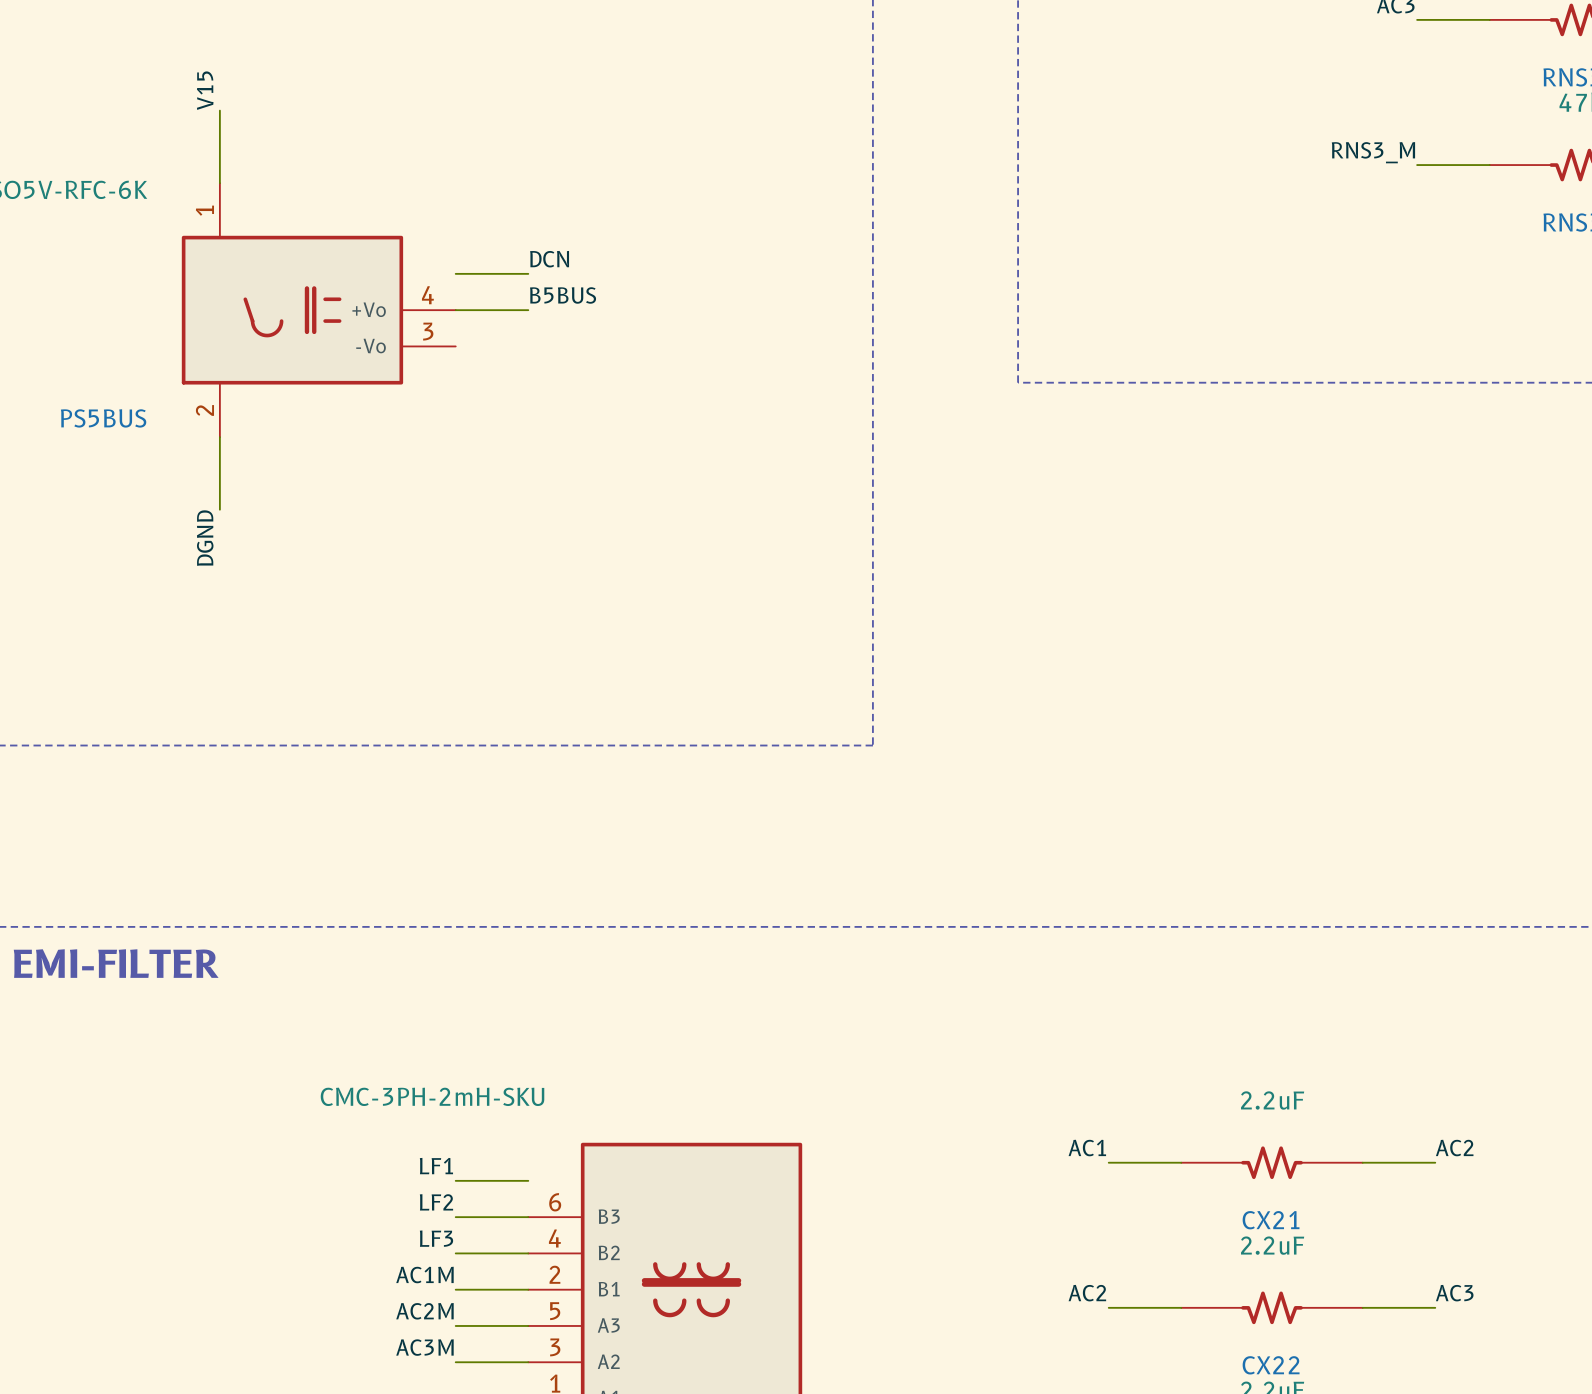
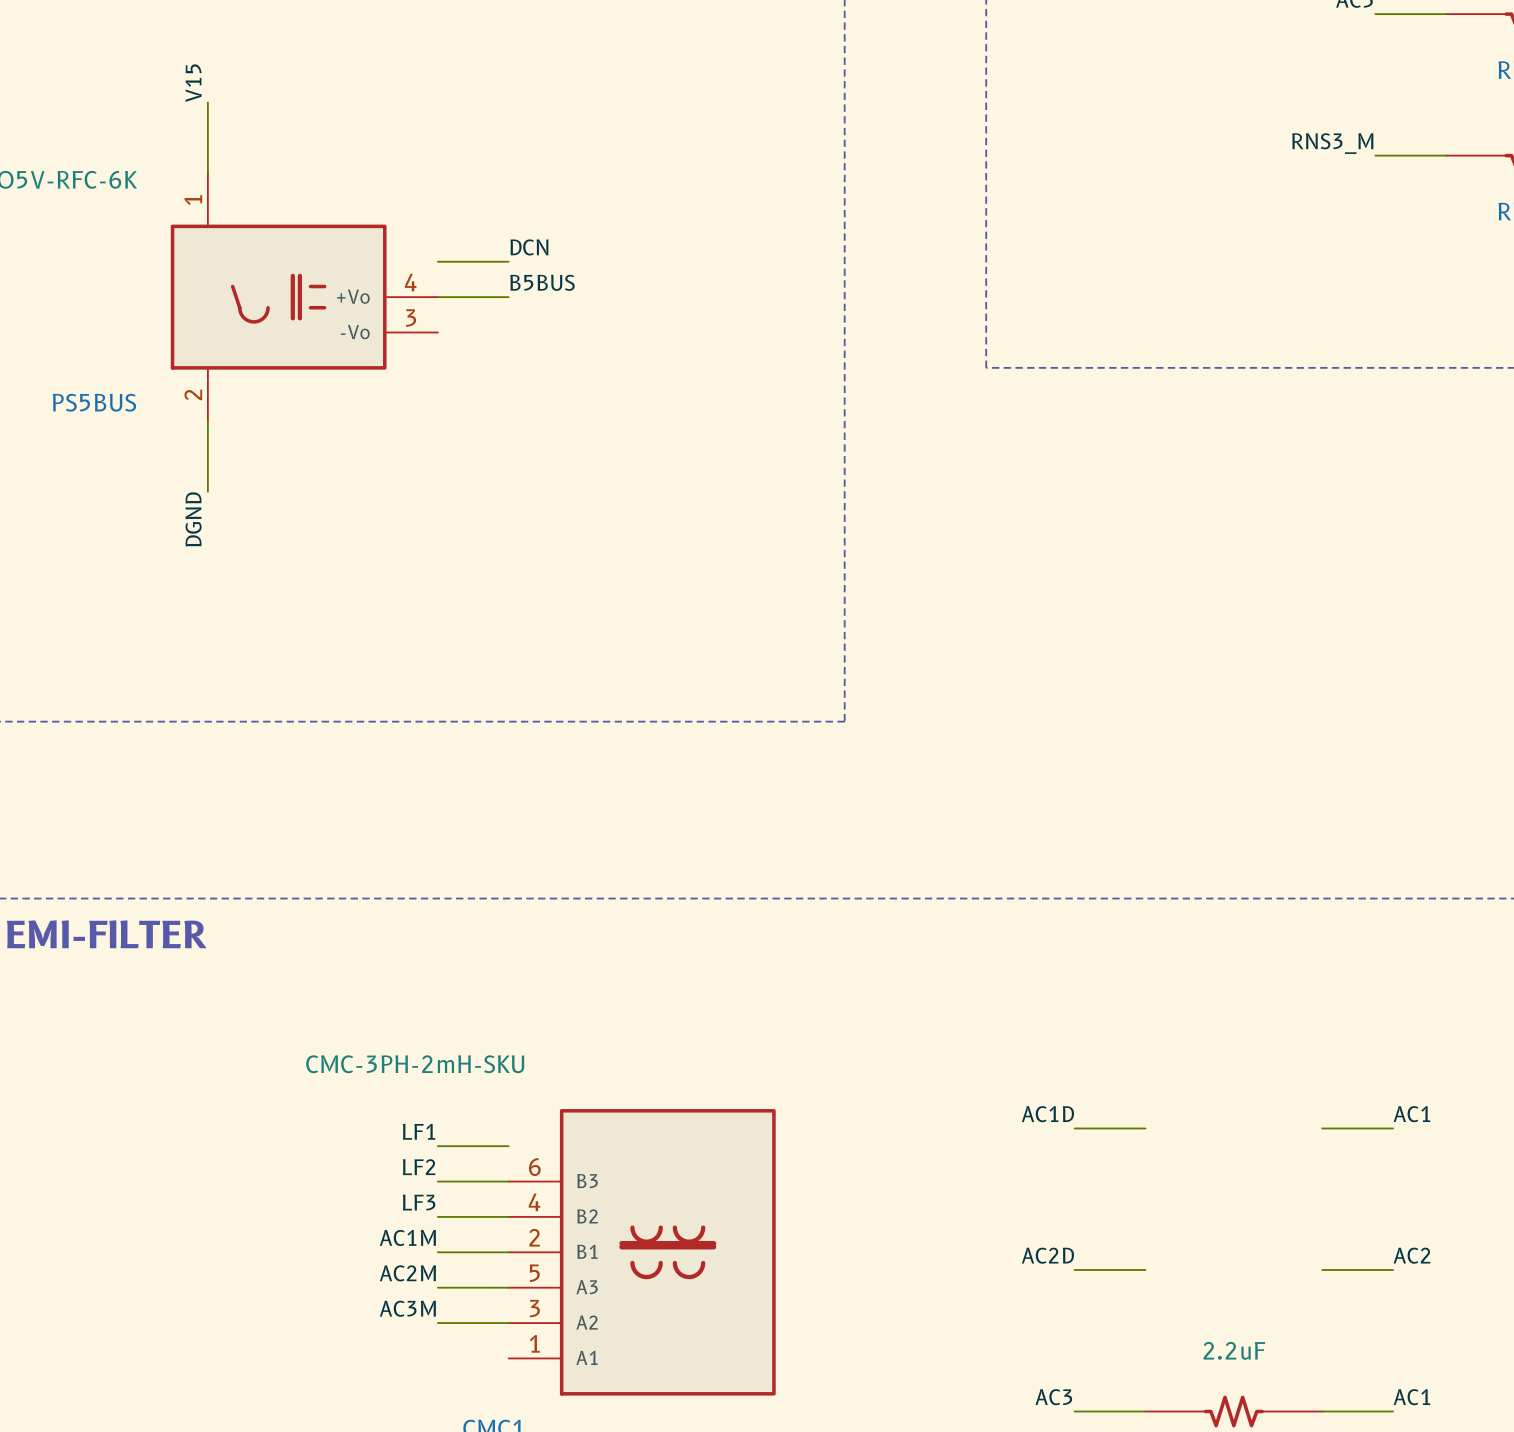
label: AC1 (1087, 1148) -> AC1D (1047, 1114)
label: AC2 (1454, 1148) -> AC1 (1411, 1114)
CX21: 2.2uF (1272, 1162) -> none
label: AC2 (1087, 1293) -> AC2D (1047, 1255)
label: AC3 (1454, 1293) -> AC2 (1411, 1255)
CX22: 2.2uF (1272, 1307) -> none

